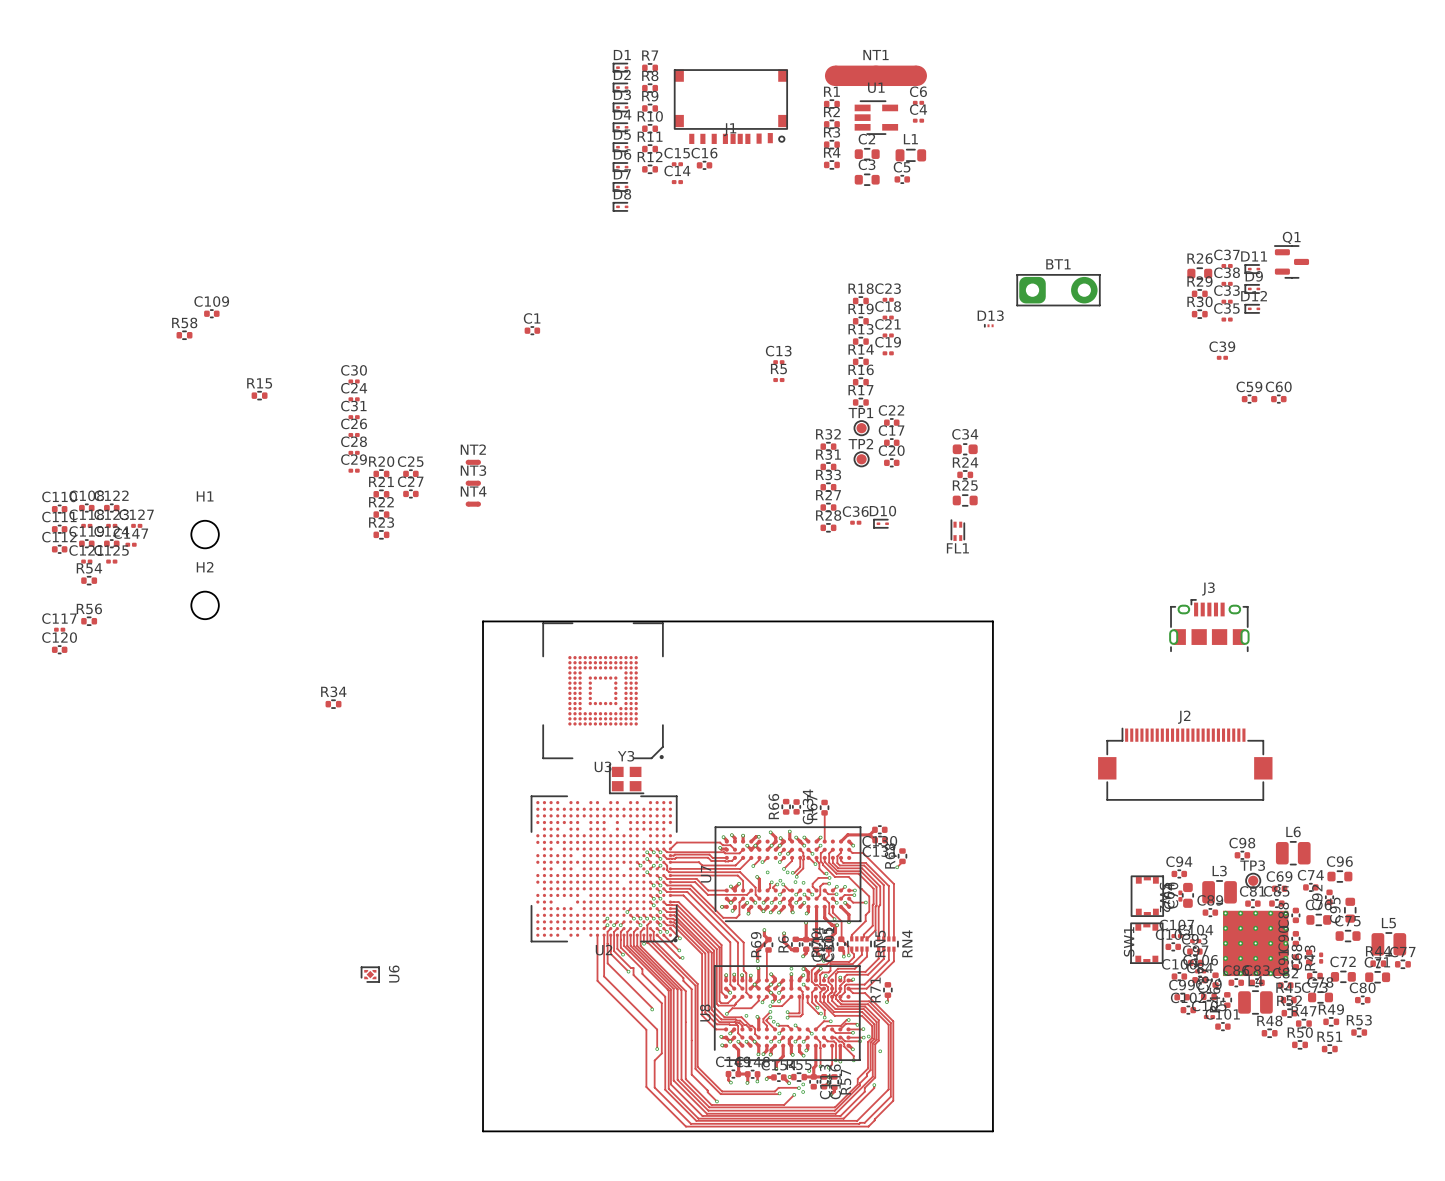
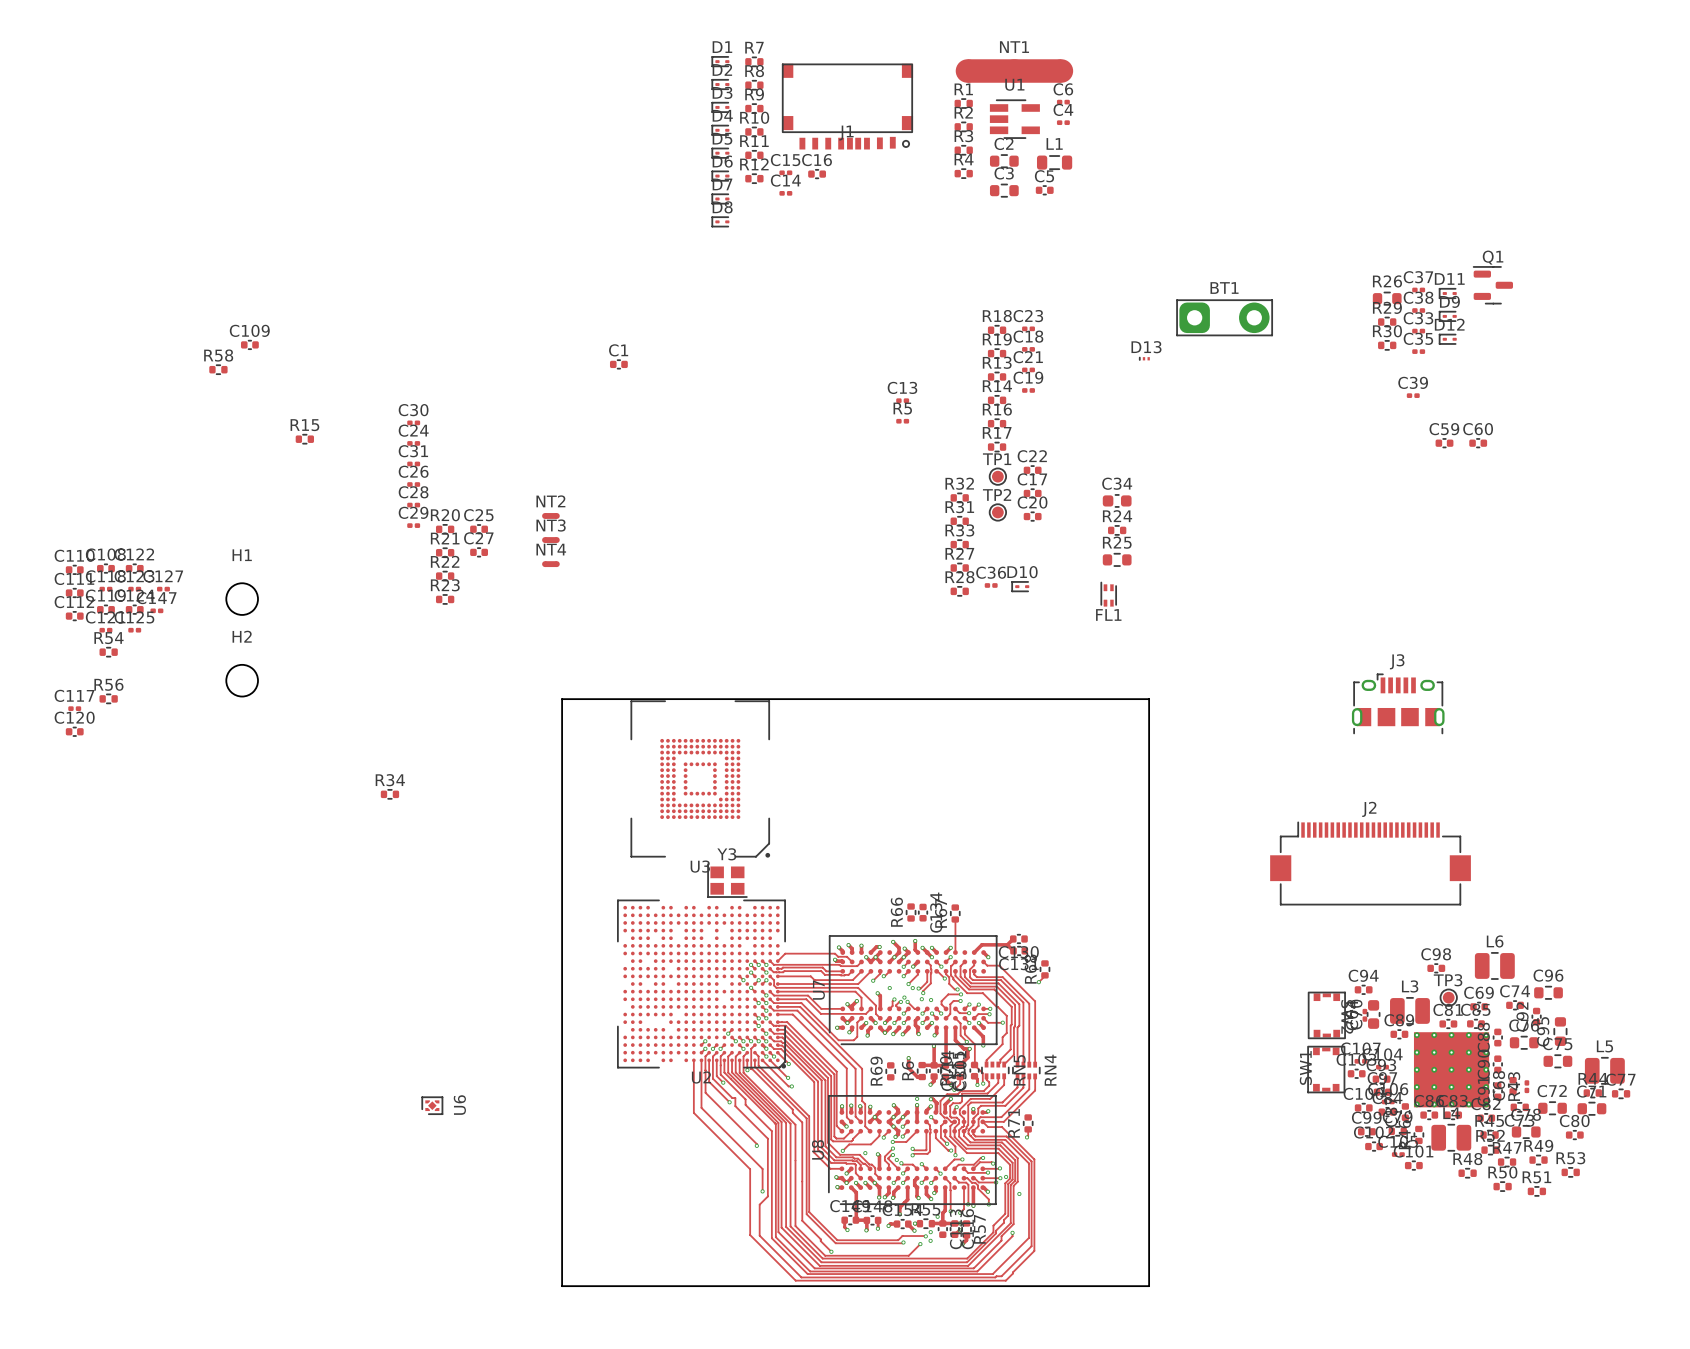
track: (764, 930) (764, 935) (768, 939) (757, 950) (757, 961) -> none
via: (764, 930) -> none
track: (768, 949) (766, 951) (766, 980) -> none
via: (757, 961) -> none
track: (758, 968) (758, 980) -> none
via: (758, 968) -> none

